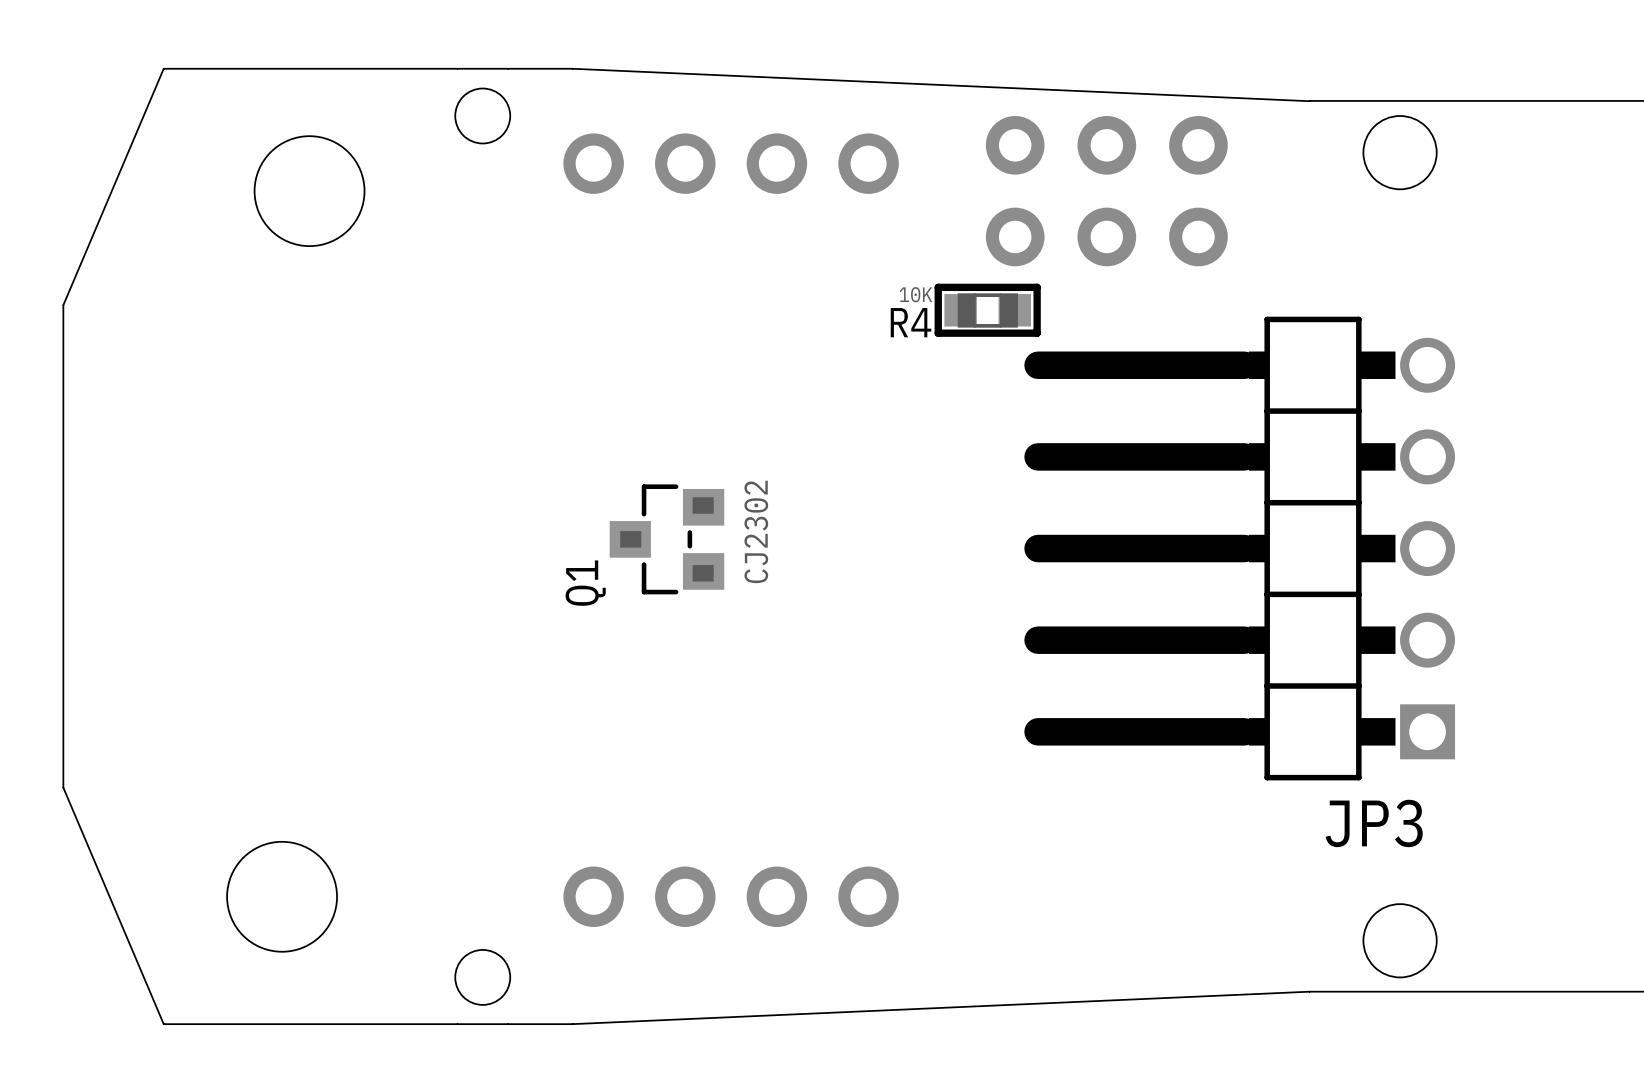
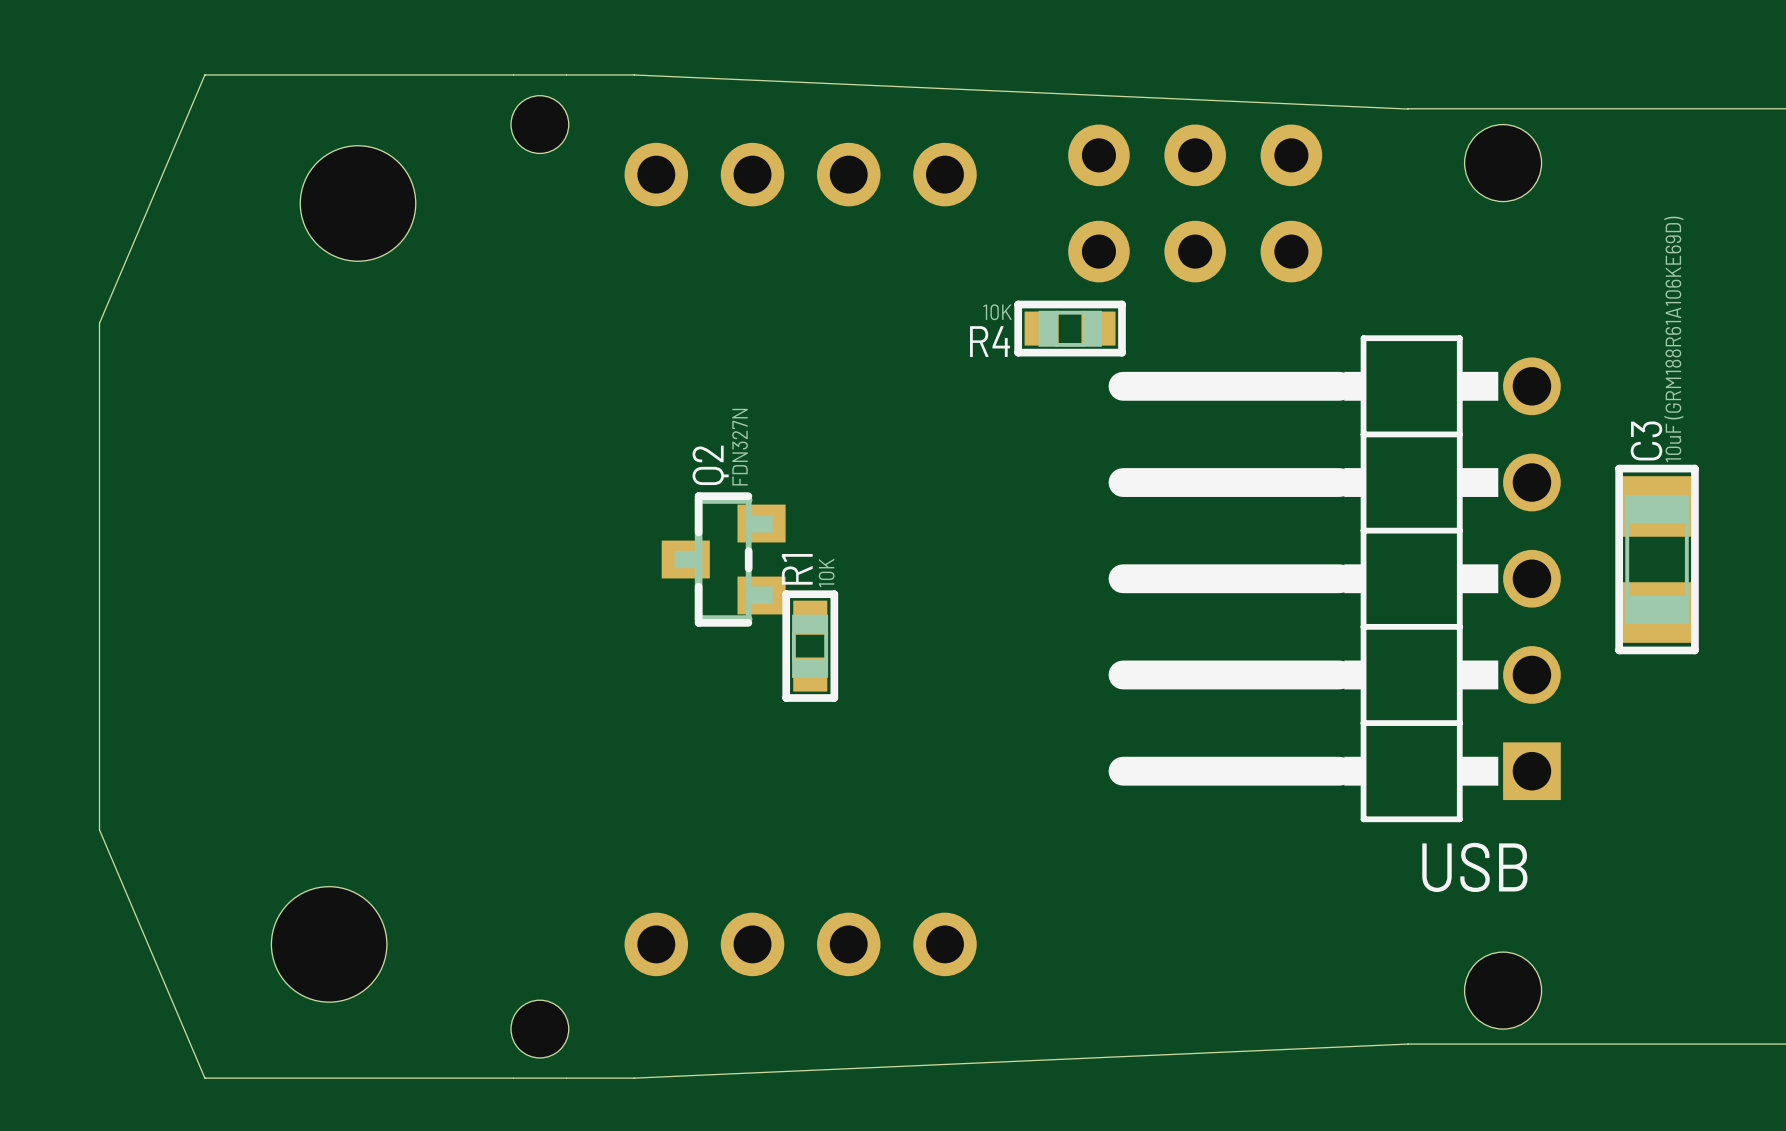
Q2: none -> FDN327N (723, 559)
C3: none -> 10uF (GRM188R61A106KE69D) (1657, 559)
Q1: CJ2302 (666, 539) -> none
R1: none -> 10K (810, 646)
JP3 name: JP3 (1374, 823) -> USB (1474, 867)

